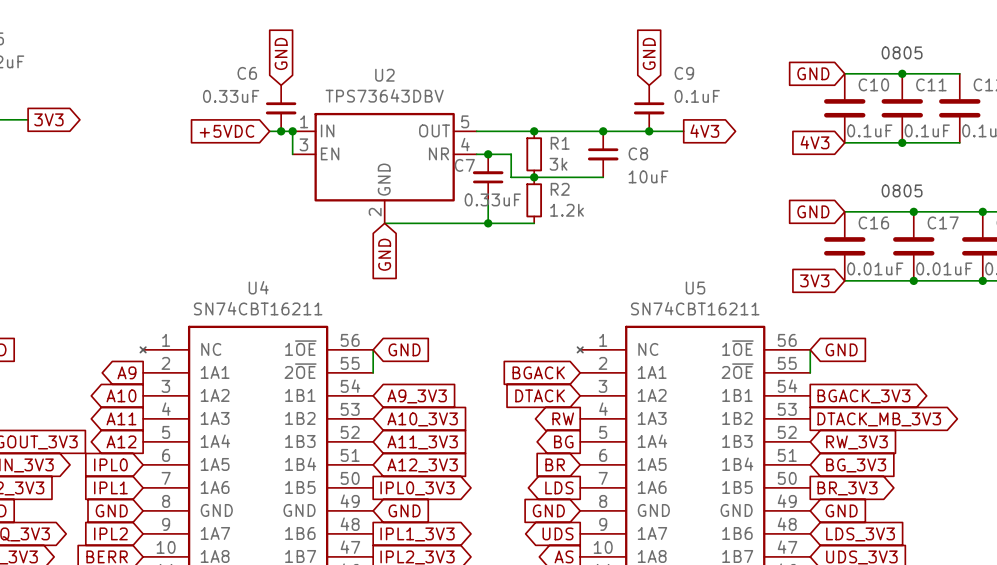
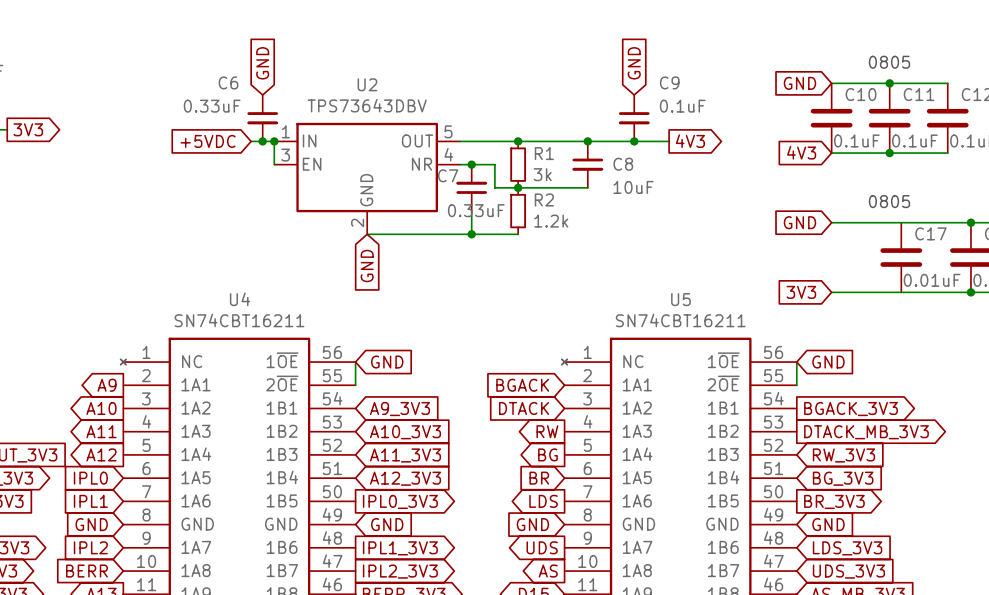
junction: (913, 211) -> none
C16: 0.01uF (844, 246) -> none
junction: (913, 280) -> none

